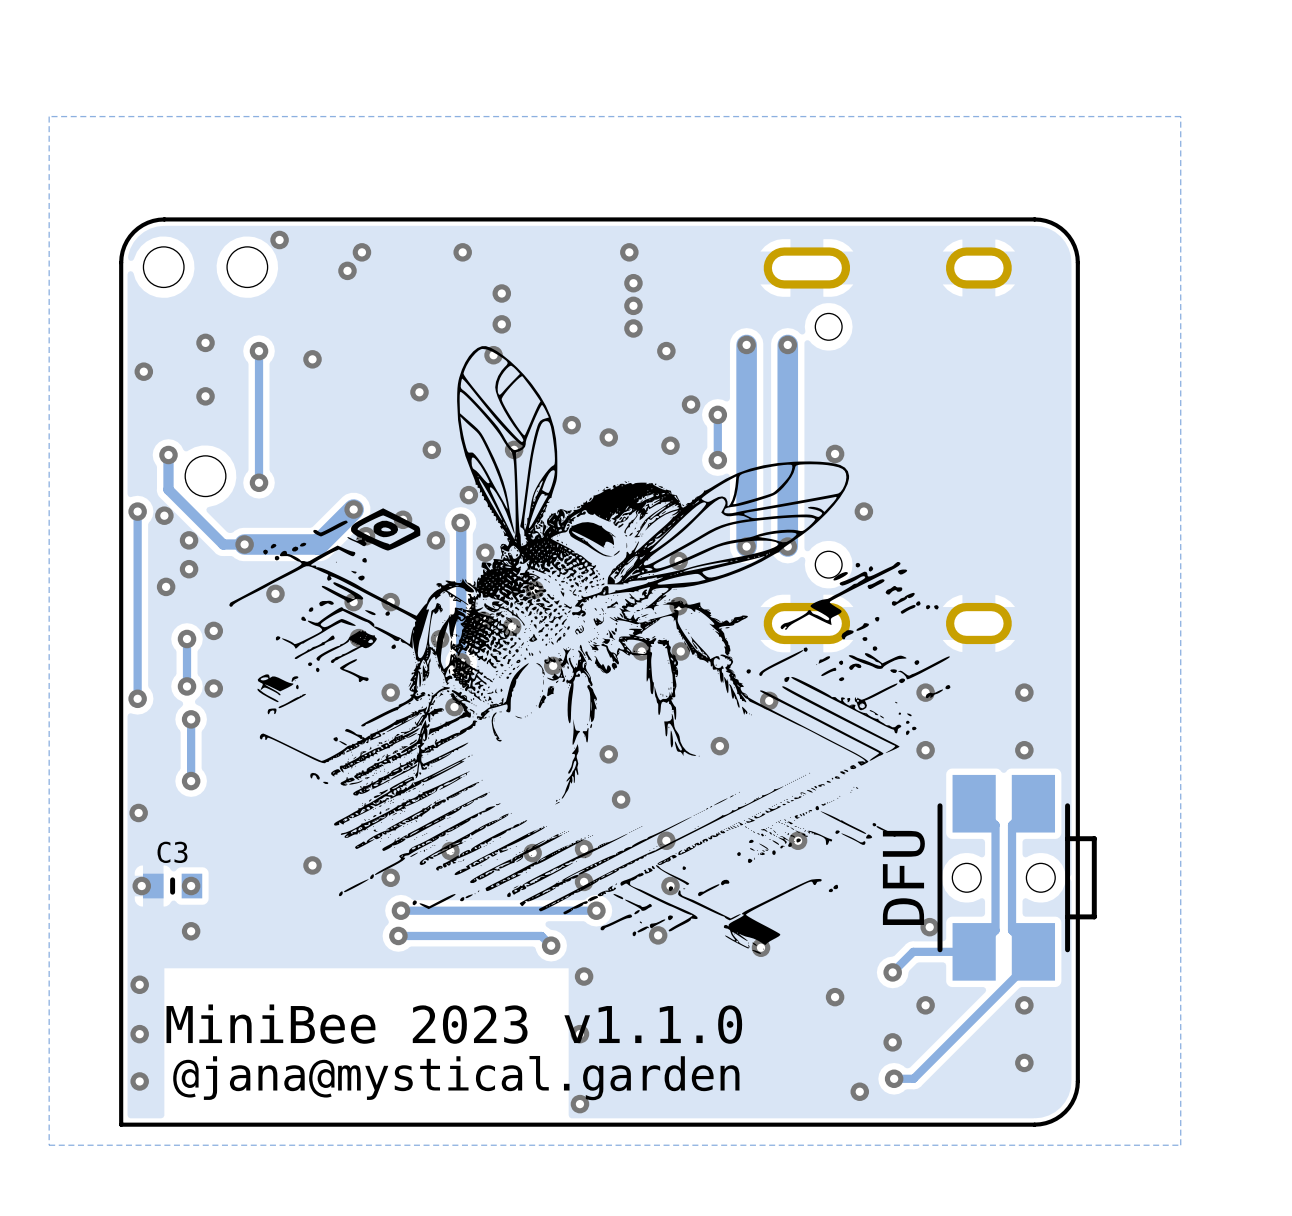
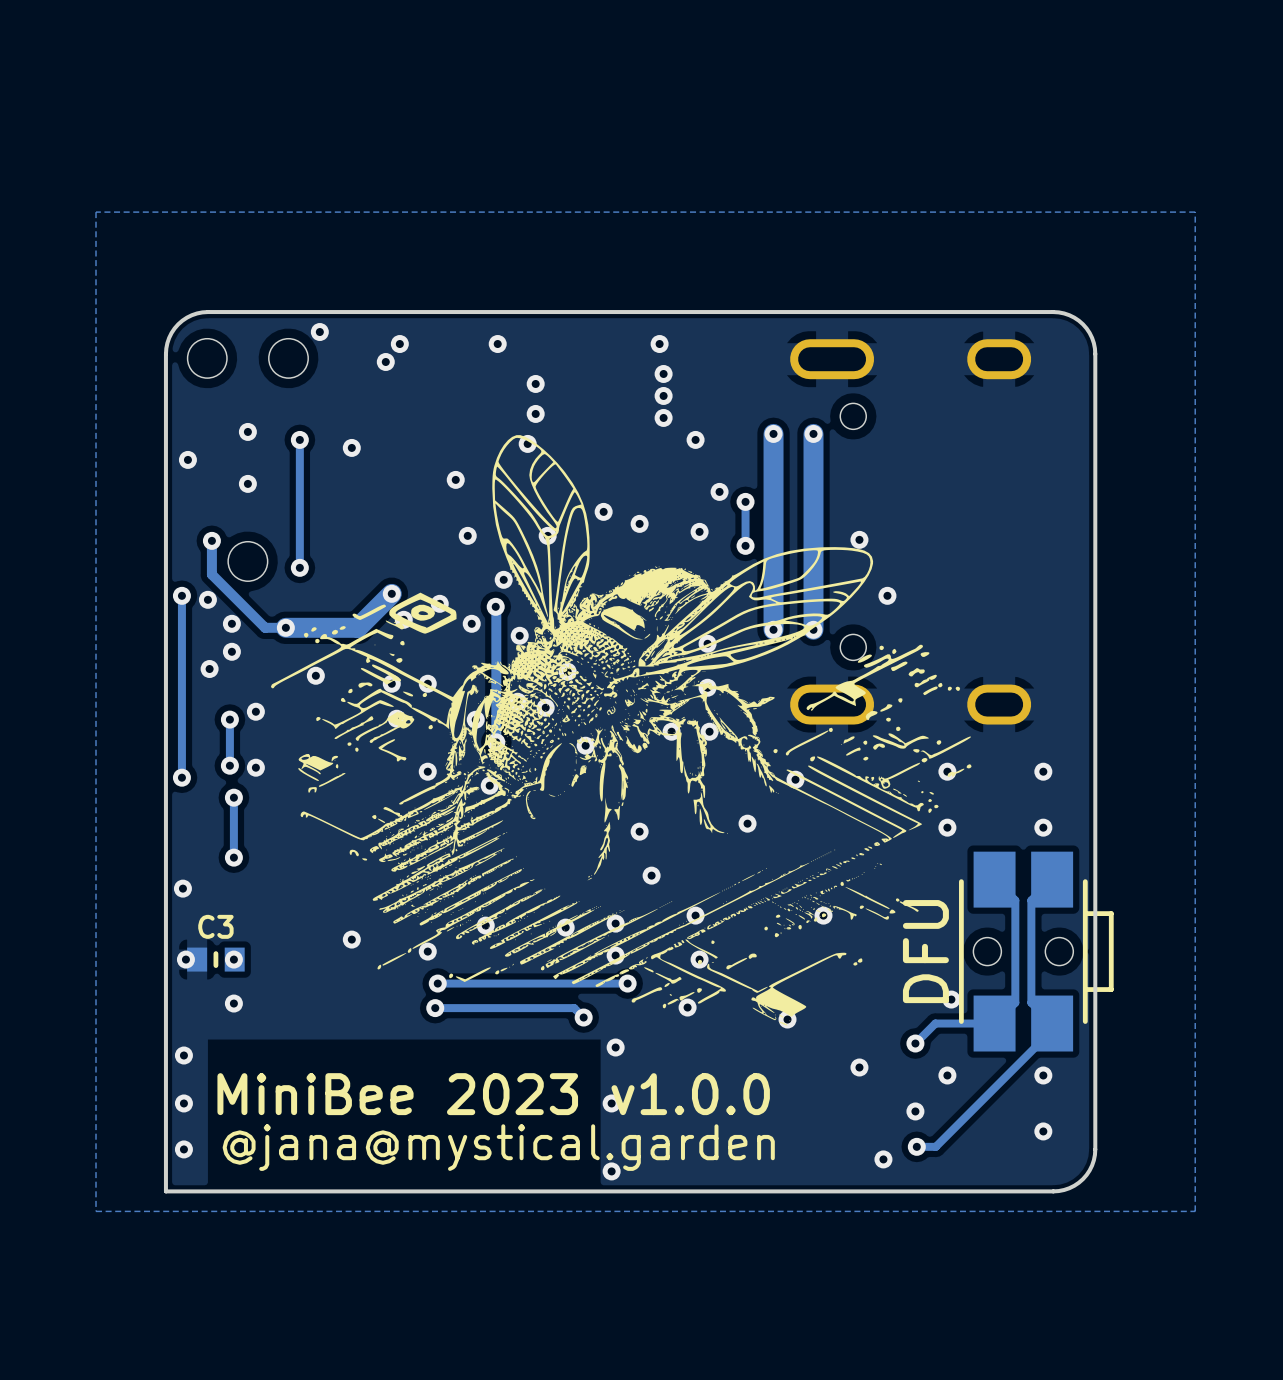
text: MiniBee 2023 v1.1.0 (454, 1024) -> MiniBee 2023 v1.0.0 (493, 1094)

